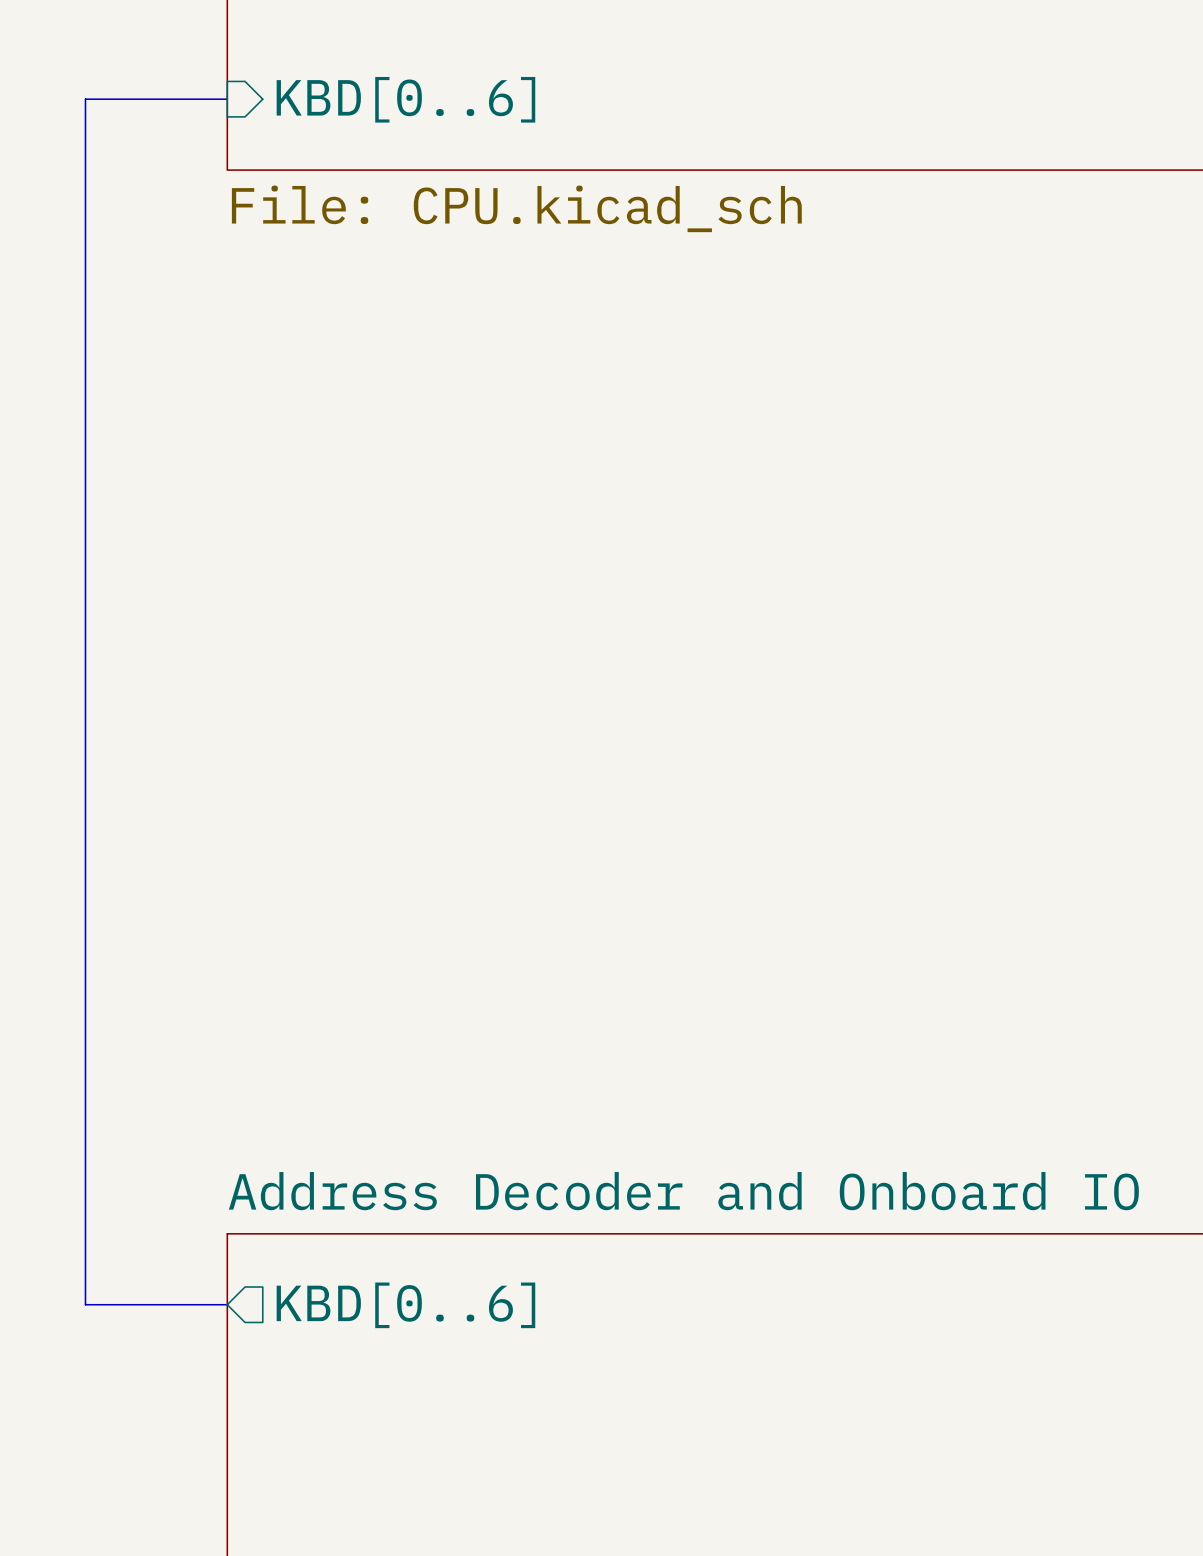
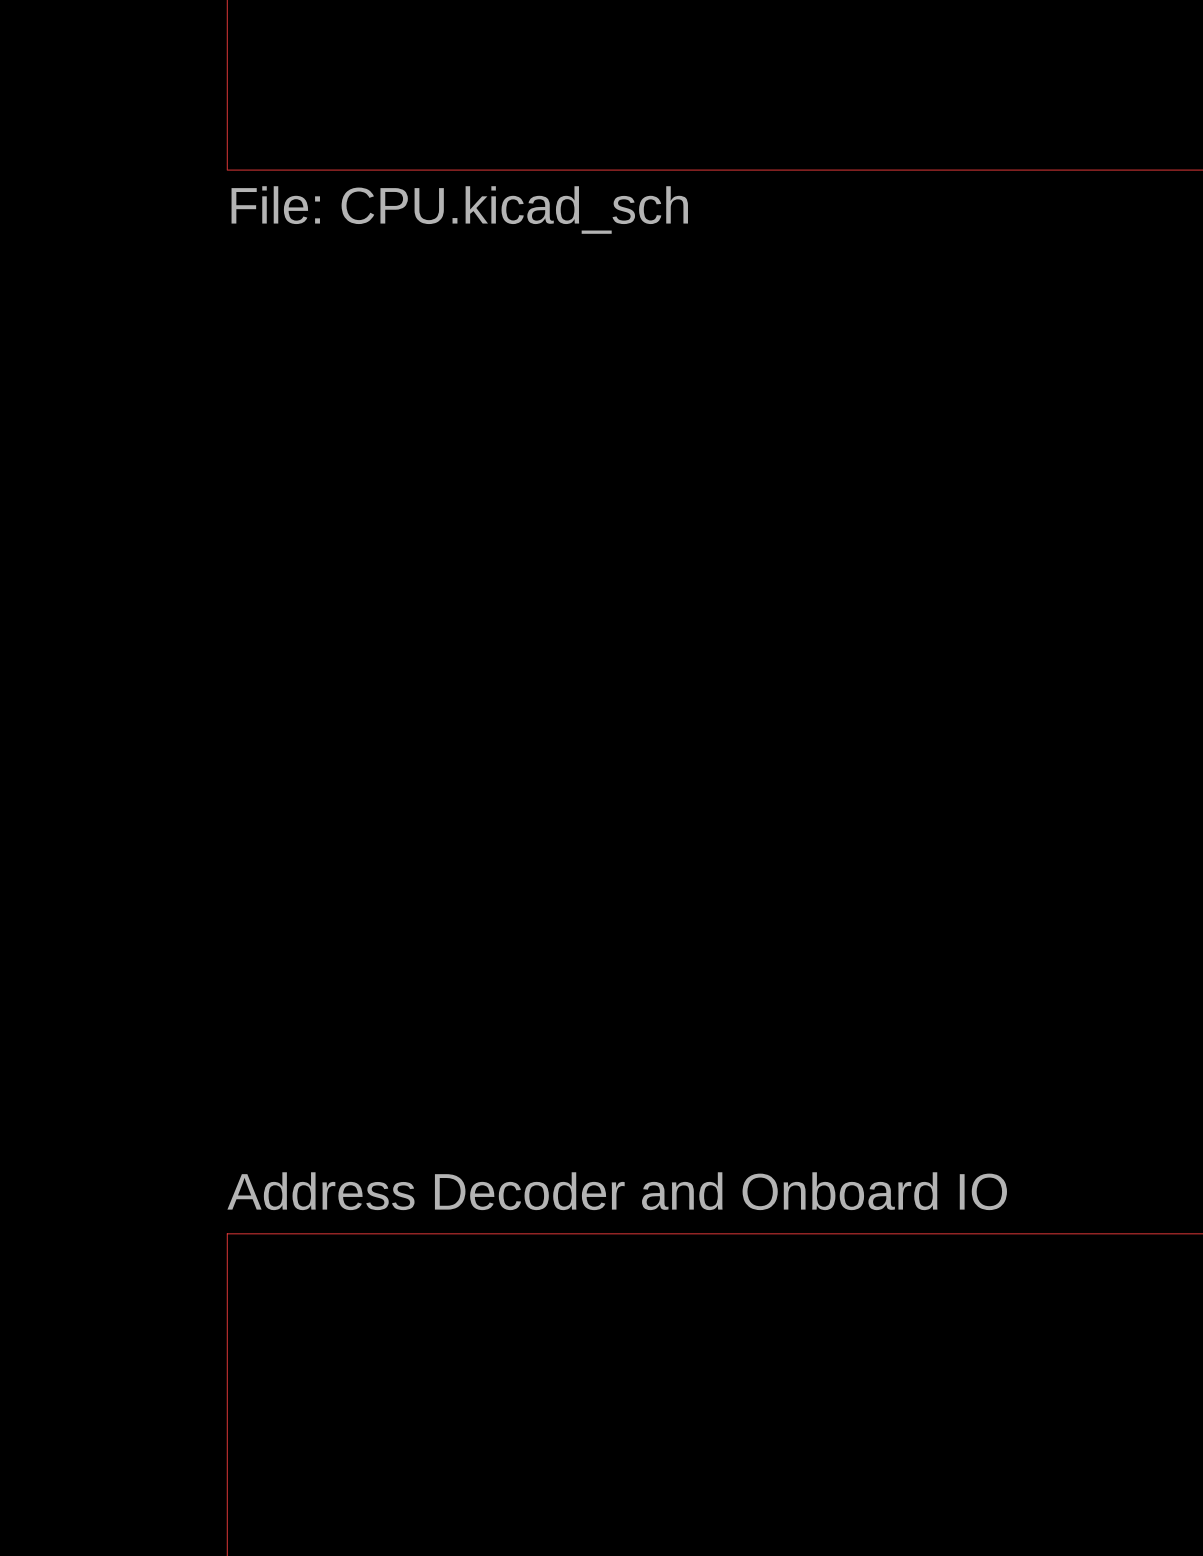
bus: (227, 99) (85, 99) (85, 1304) (227, 1304) -> none
sheet pin: KBD[0..6] (405, 99) -> none
sheet pin: KBD[0..6] (405, 1305) -> none

